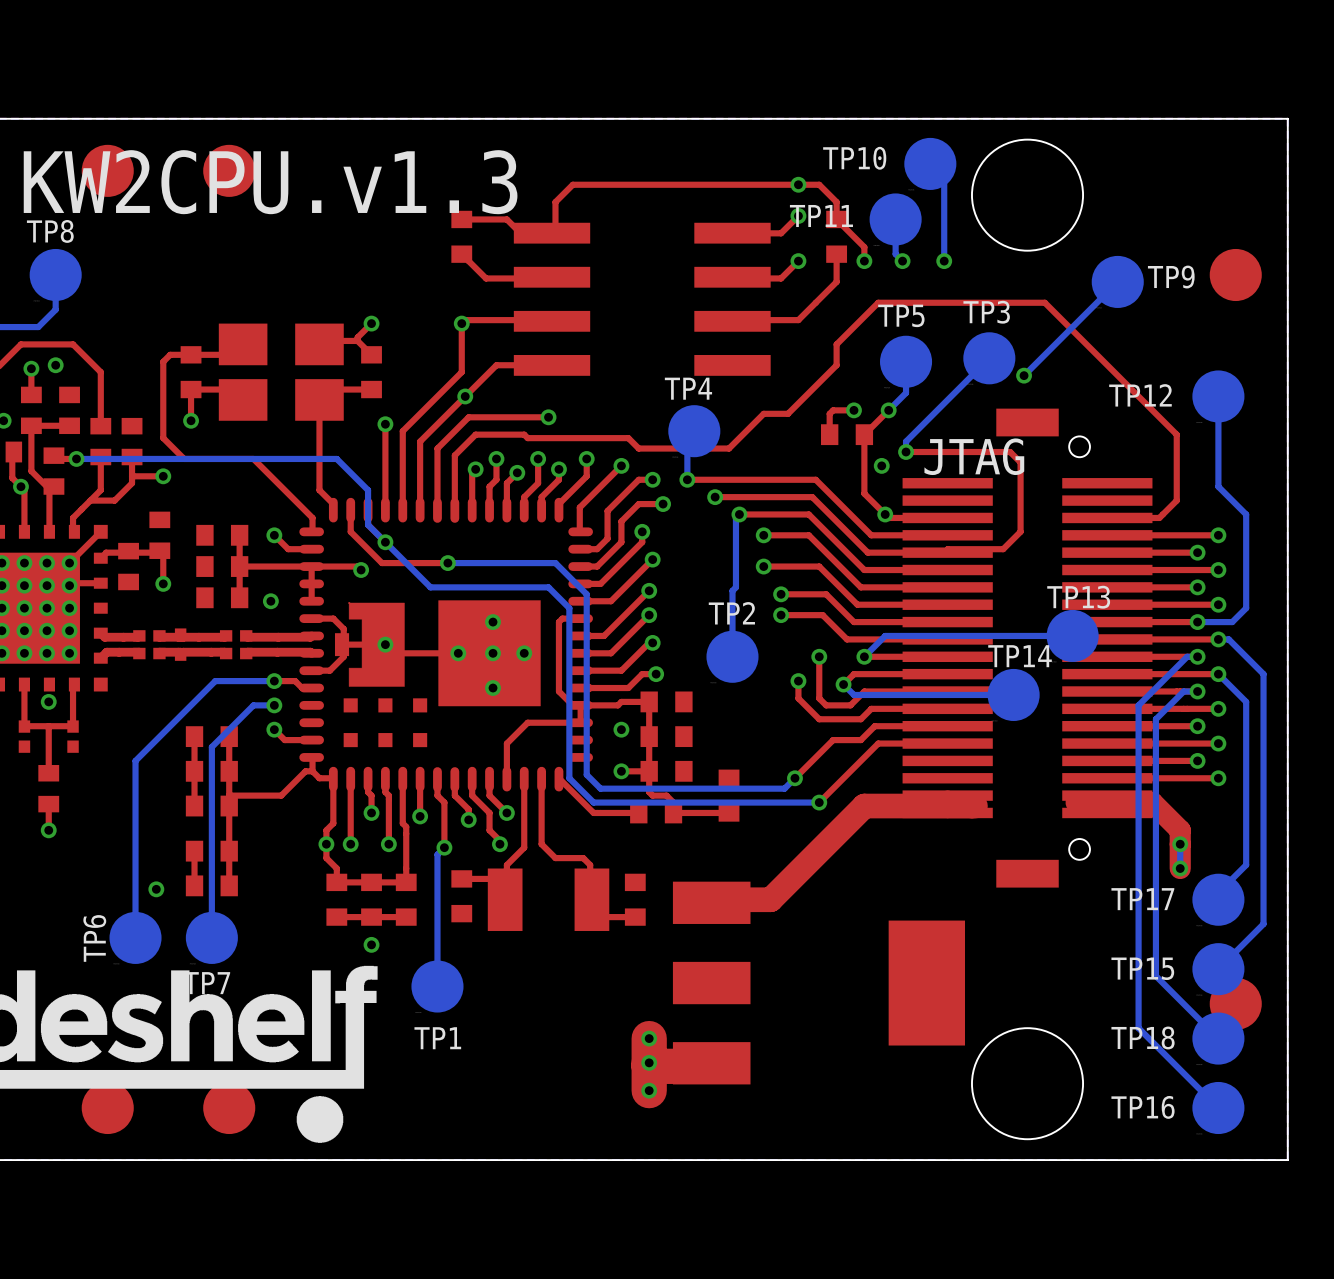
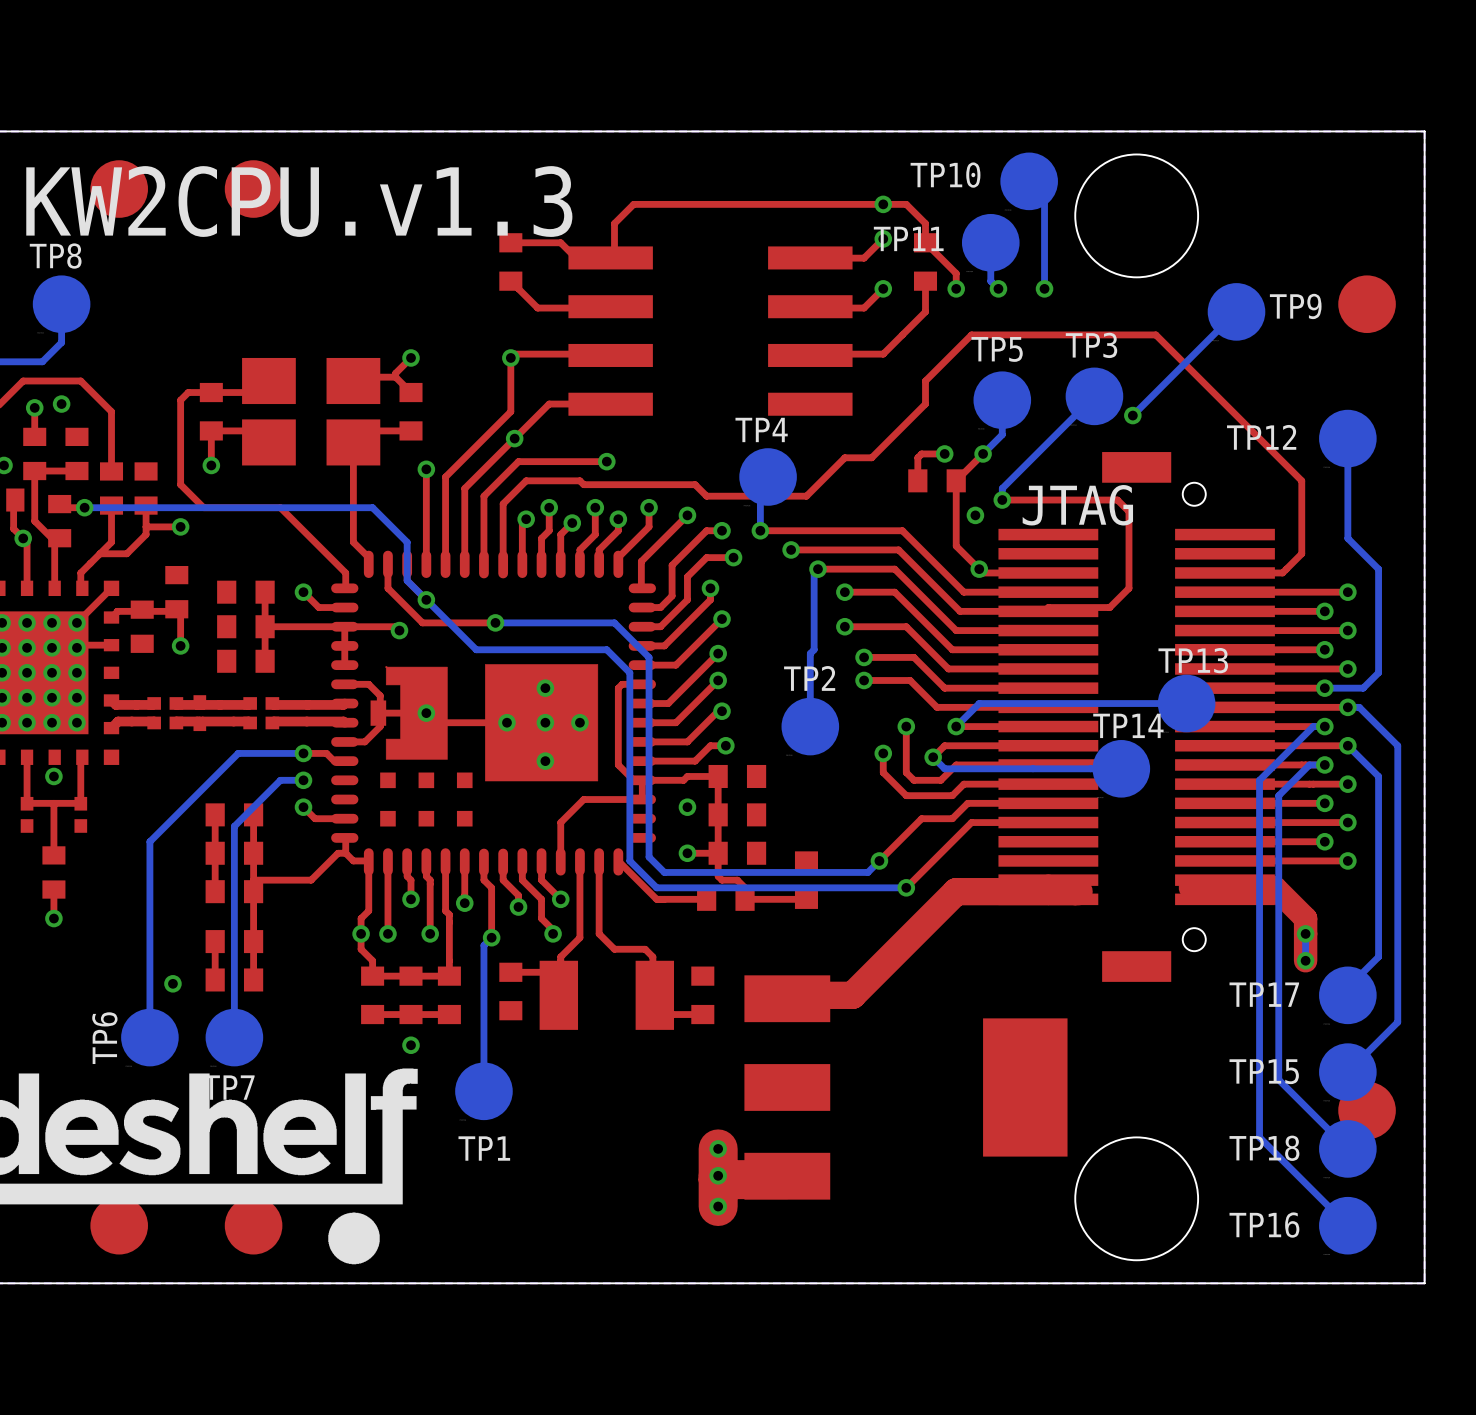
via: (270, 601) -> none

